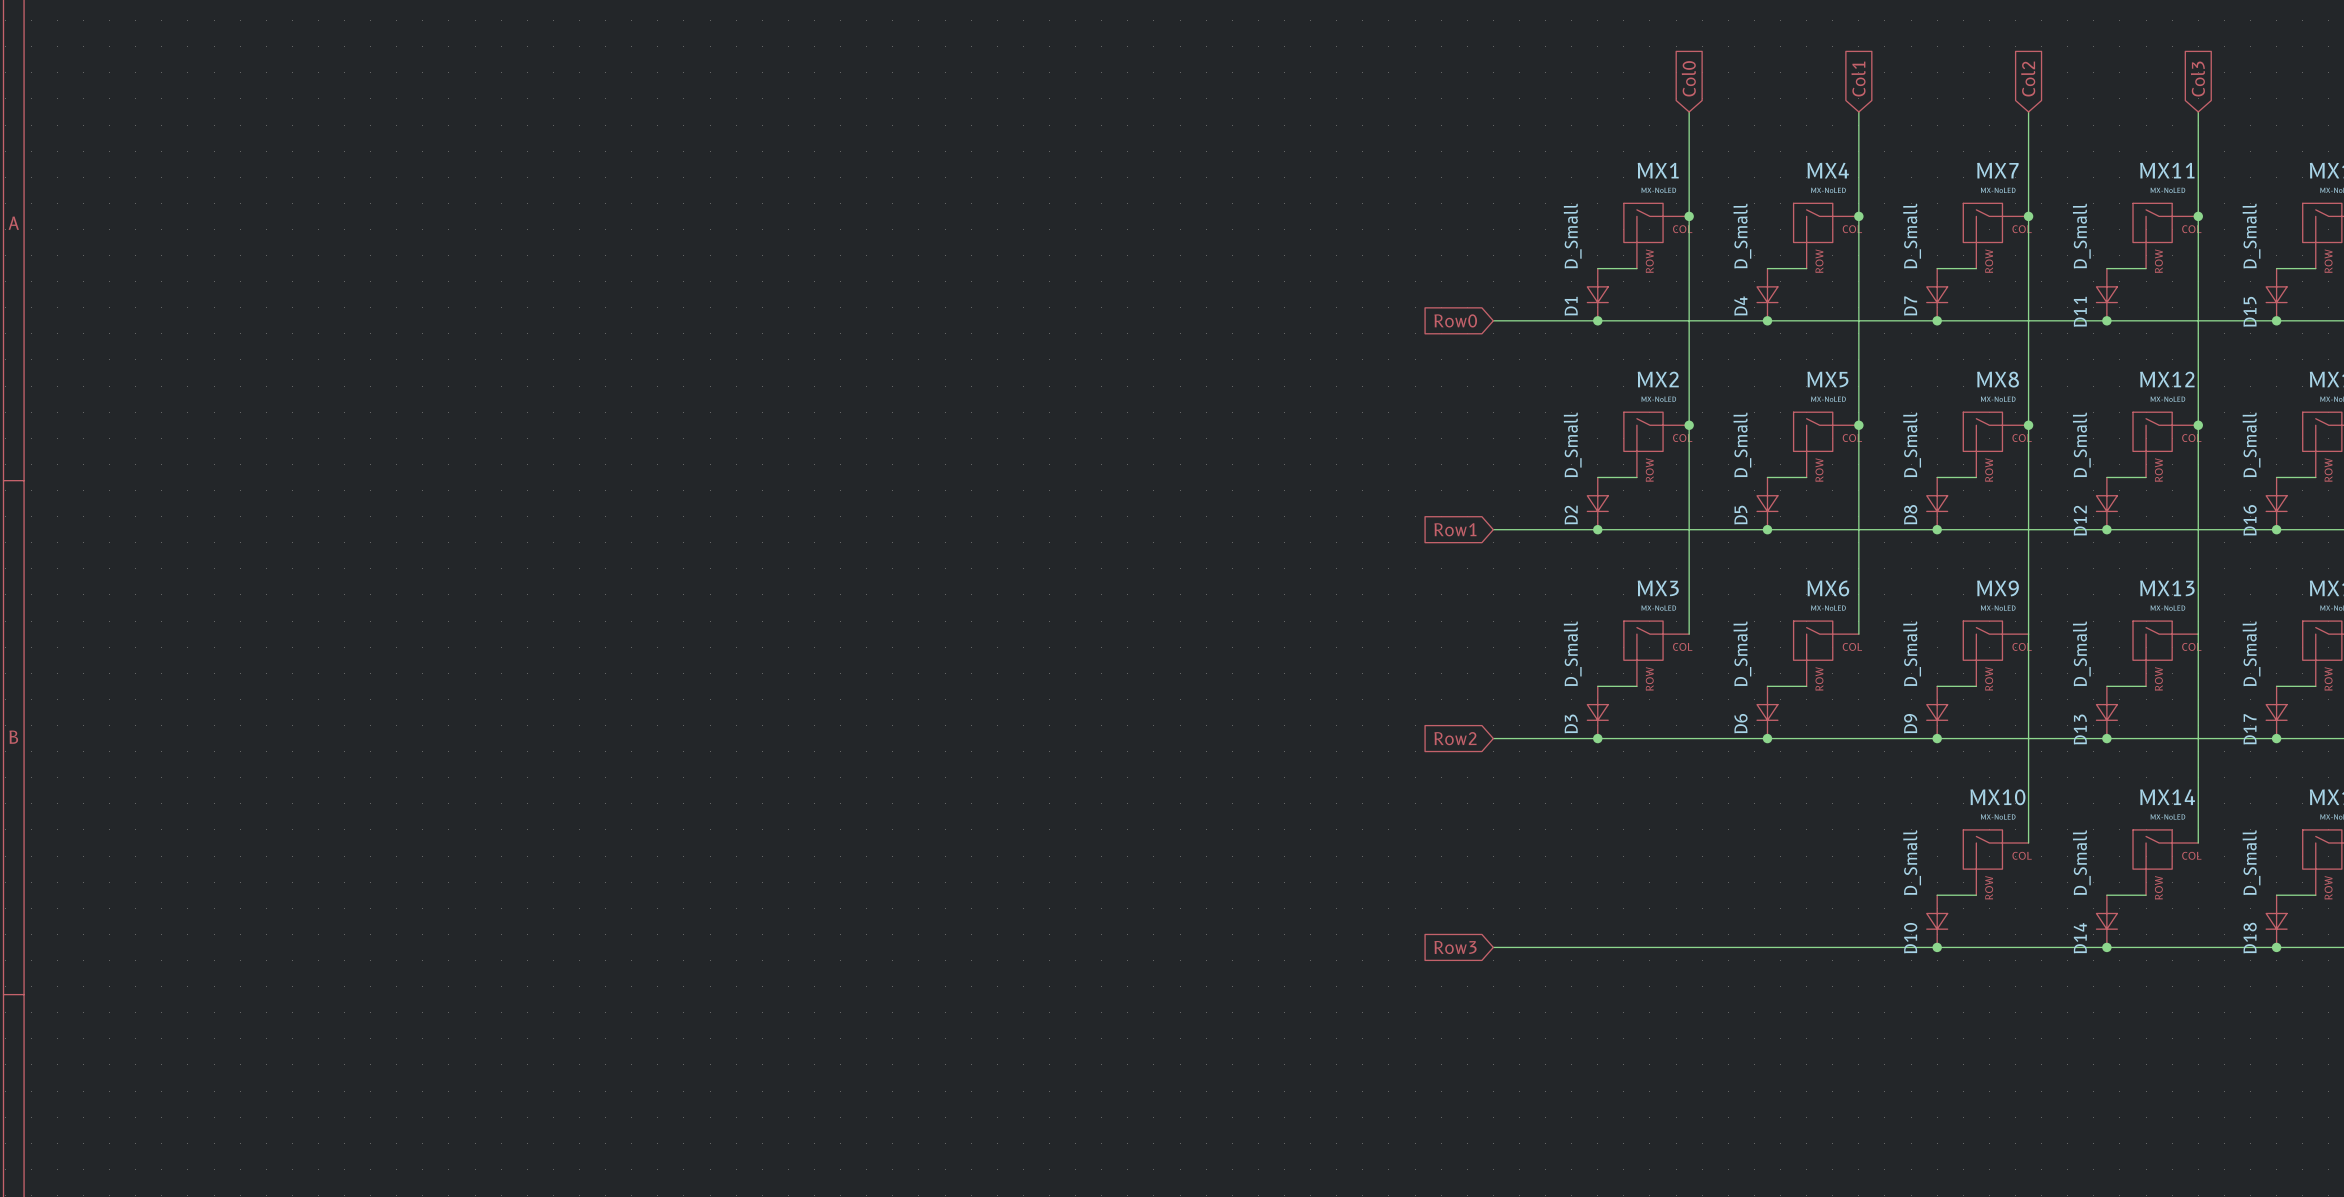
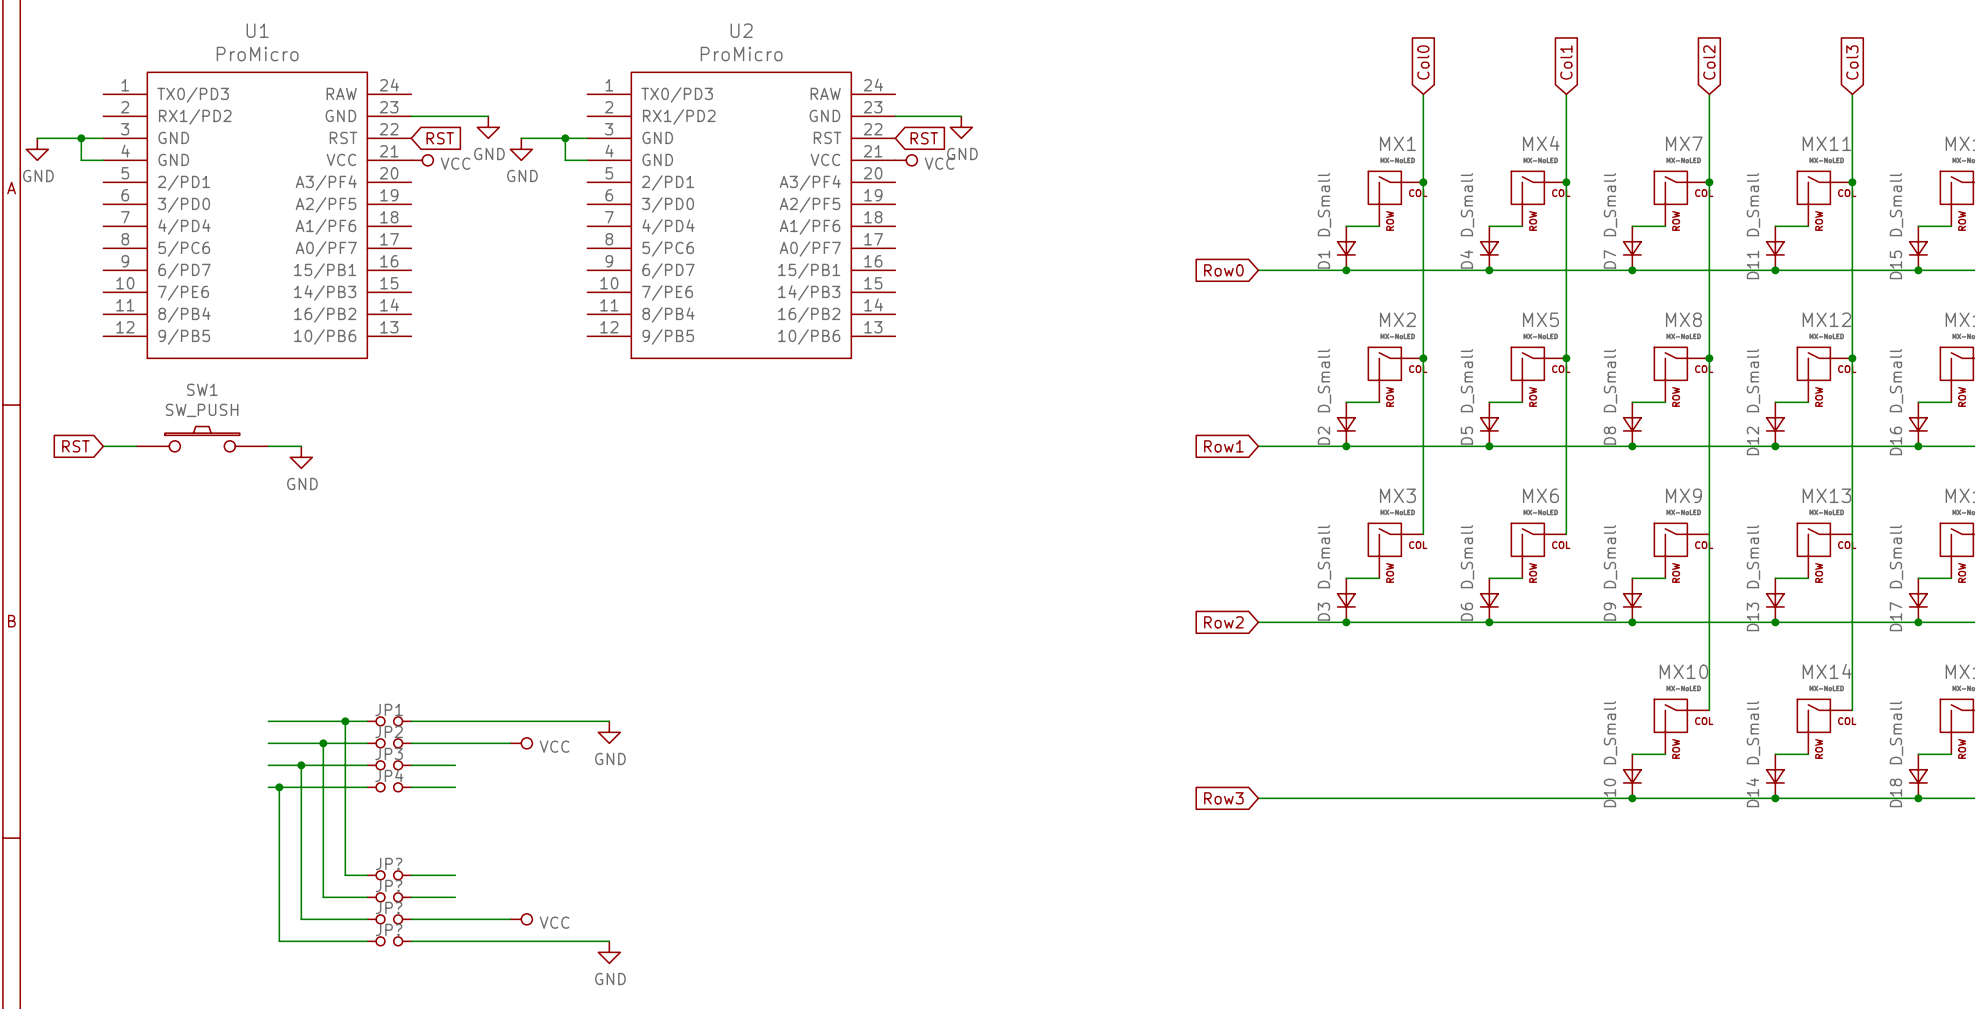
wire: none -> (411, 116) (488, 116)
wire: none -> (895, 116) (961, 116)
power symbol: none -> GND (488, 127)
power symbol: none -> GND (961, 127)
wire: none -> (37, 138) (103, 138)
wire: none -> (81, 138) (81, 160) (103, 160)
junction: none -> (81, 138)
global label: none -> RST (440, 138)
wire: none -> (521, 138) (587, 138)
wire: none -> (565, 138) (565, 160) (587, 160)
junction: none -> (565, 138)
global label: none -> RST (924, 138)
power symbol: none -> GND (37, 149)
power symbol: none -> GND (521, 149)
power symbol: none -> VCC (422, 160)
power symbol: none -> VCC (906, 160)
U1: none -> ProMicro (257, 215)
U2: none -> ProMicro (741, 215)
SW1: none -> SW_PUSH (202, 439)
global label: none -> RST (75, 446)
wire: none -> (103, 446) (136, 446)
wire: none -> (268, 446) (301, 446)
power symbol: none -> GND (301, 457)
wire: none -> (268, 721) (367, 721)
wire: none -> (345, 721) (345, 875) (367, 875)
junction: none -> (345, 721)
JP1: none -> (389, 721)
wire: none -> (411, 721) (609, 721)
power symbol: none -> GND (609, 732)
wire: none -> (268, 743) (367, 743)
wire: none -> (323, 743) (323, 897) (367, 897)
junction: none -> (323, 743)
JP2: none -> (389, 743)
wire: none -> (411, 743) (510, 743)
power symbol: none -> VCC (521, 743)
wire: none -> (268, 765) (367, 765)
wire: none -> (301, 765) (301, 919) (367, 919)
junction: none -> (301, 765)
JP3: none -> (389, 765)
wire: none -> (411, 765) (455, 765)
wire: none -> (268, 787) (367, 787)
wire: none -> (279, 787) (279, 941) (367, 941)
junction: none -> (279, 787)
JP4: none -> (389, 787)
wire: none -> (411, 787) (455, 787)
JP?: none -> (389, 875)
wire: none -> (411, 875) (455, 875)
JP?: none -> (389, 897)
wire: none -> (411, 897) (455, 897)
JP?: none -> (389, 919)
wire: none -> (411, 919) (510, 919)
power symbol: none -> VCC (521, 919)
JP?: none -> (389, 941)
wire: none -> (411, 941) (609, 941)
power symbol: none -> GND (609, 952)

